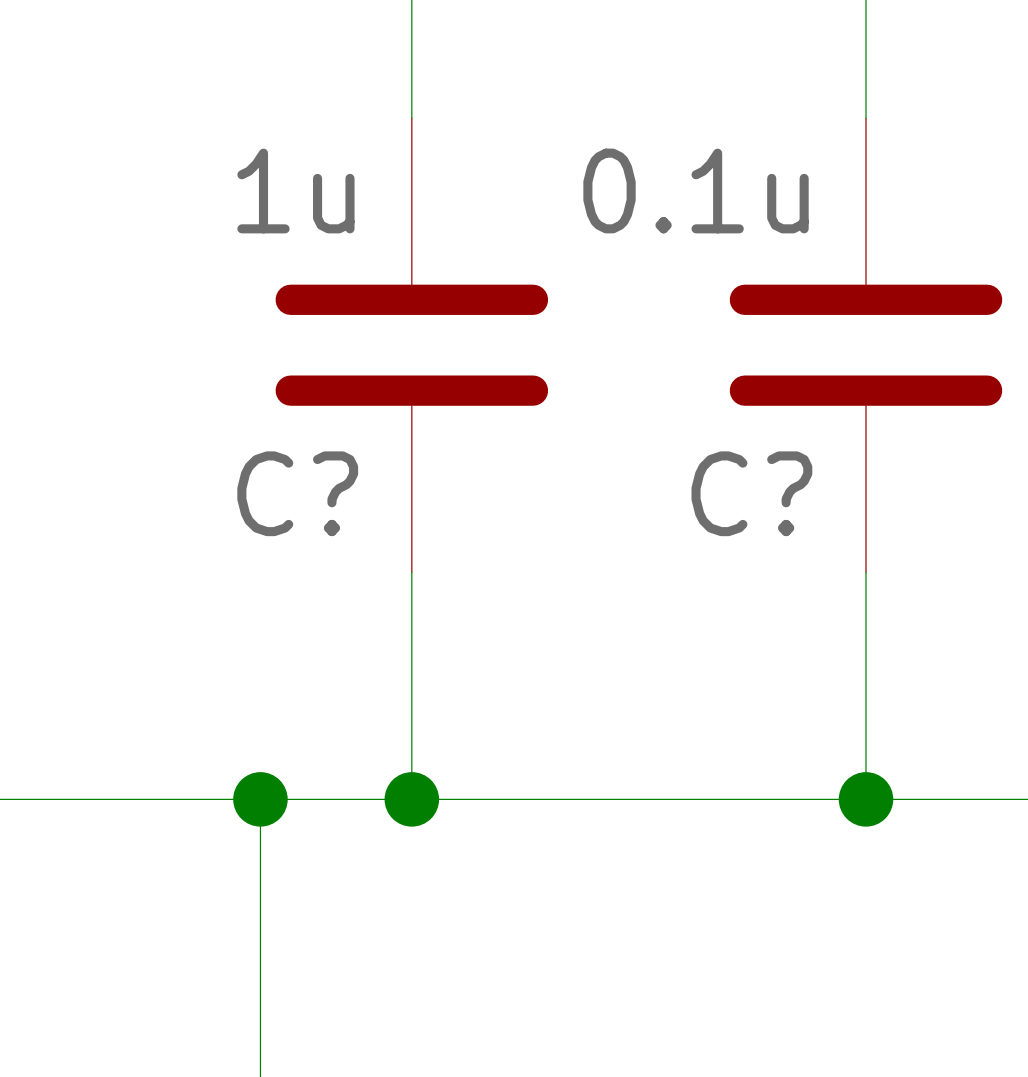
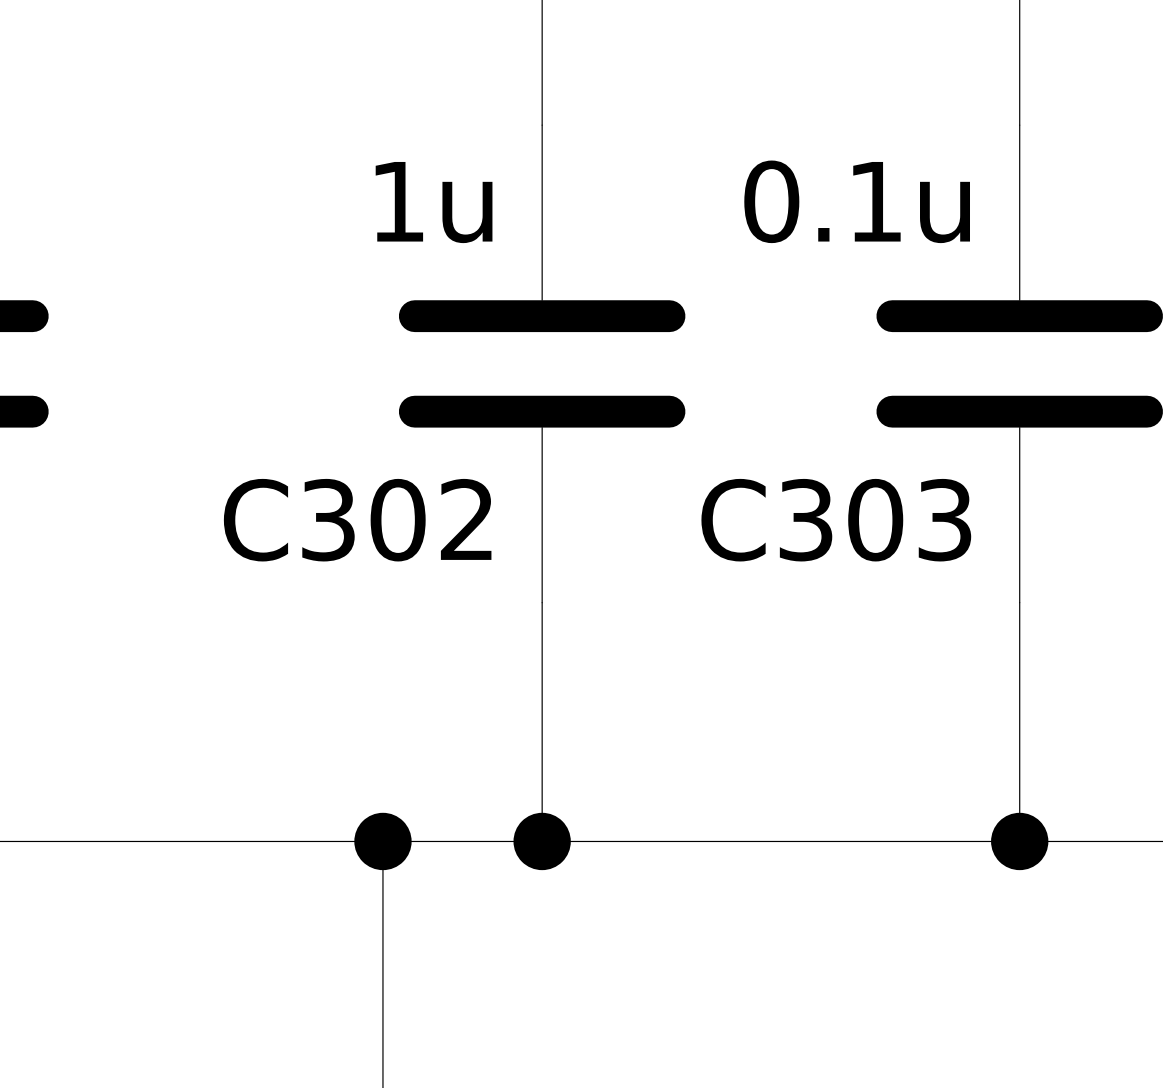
C? name: C? (297, 493) -> C302 (357, 520)
C? name: C? (751, 493) -> C303 (836, 520)

